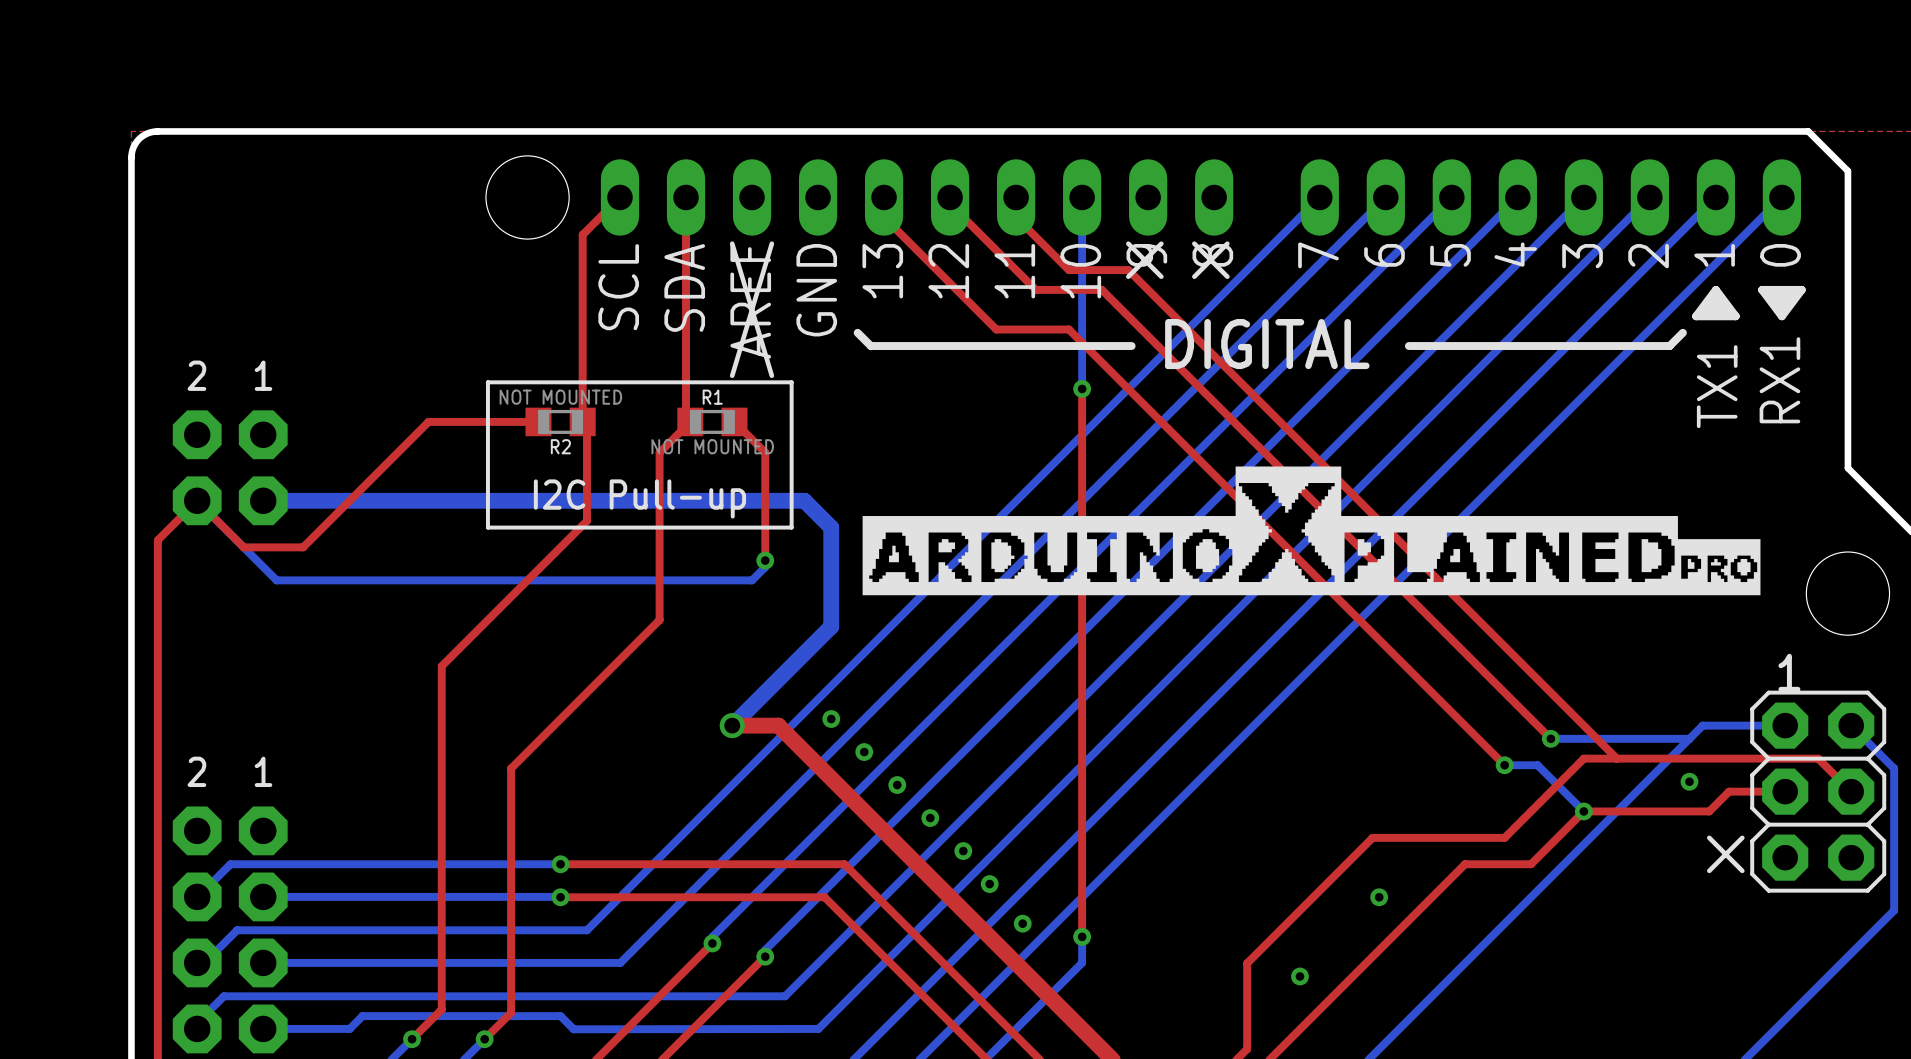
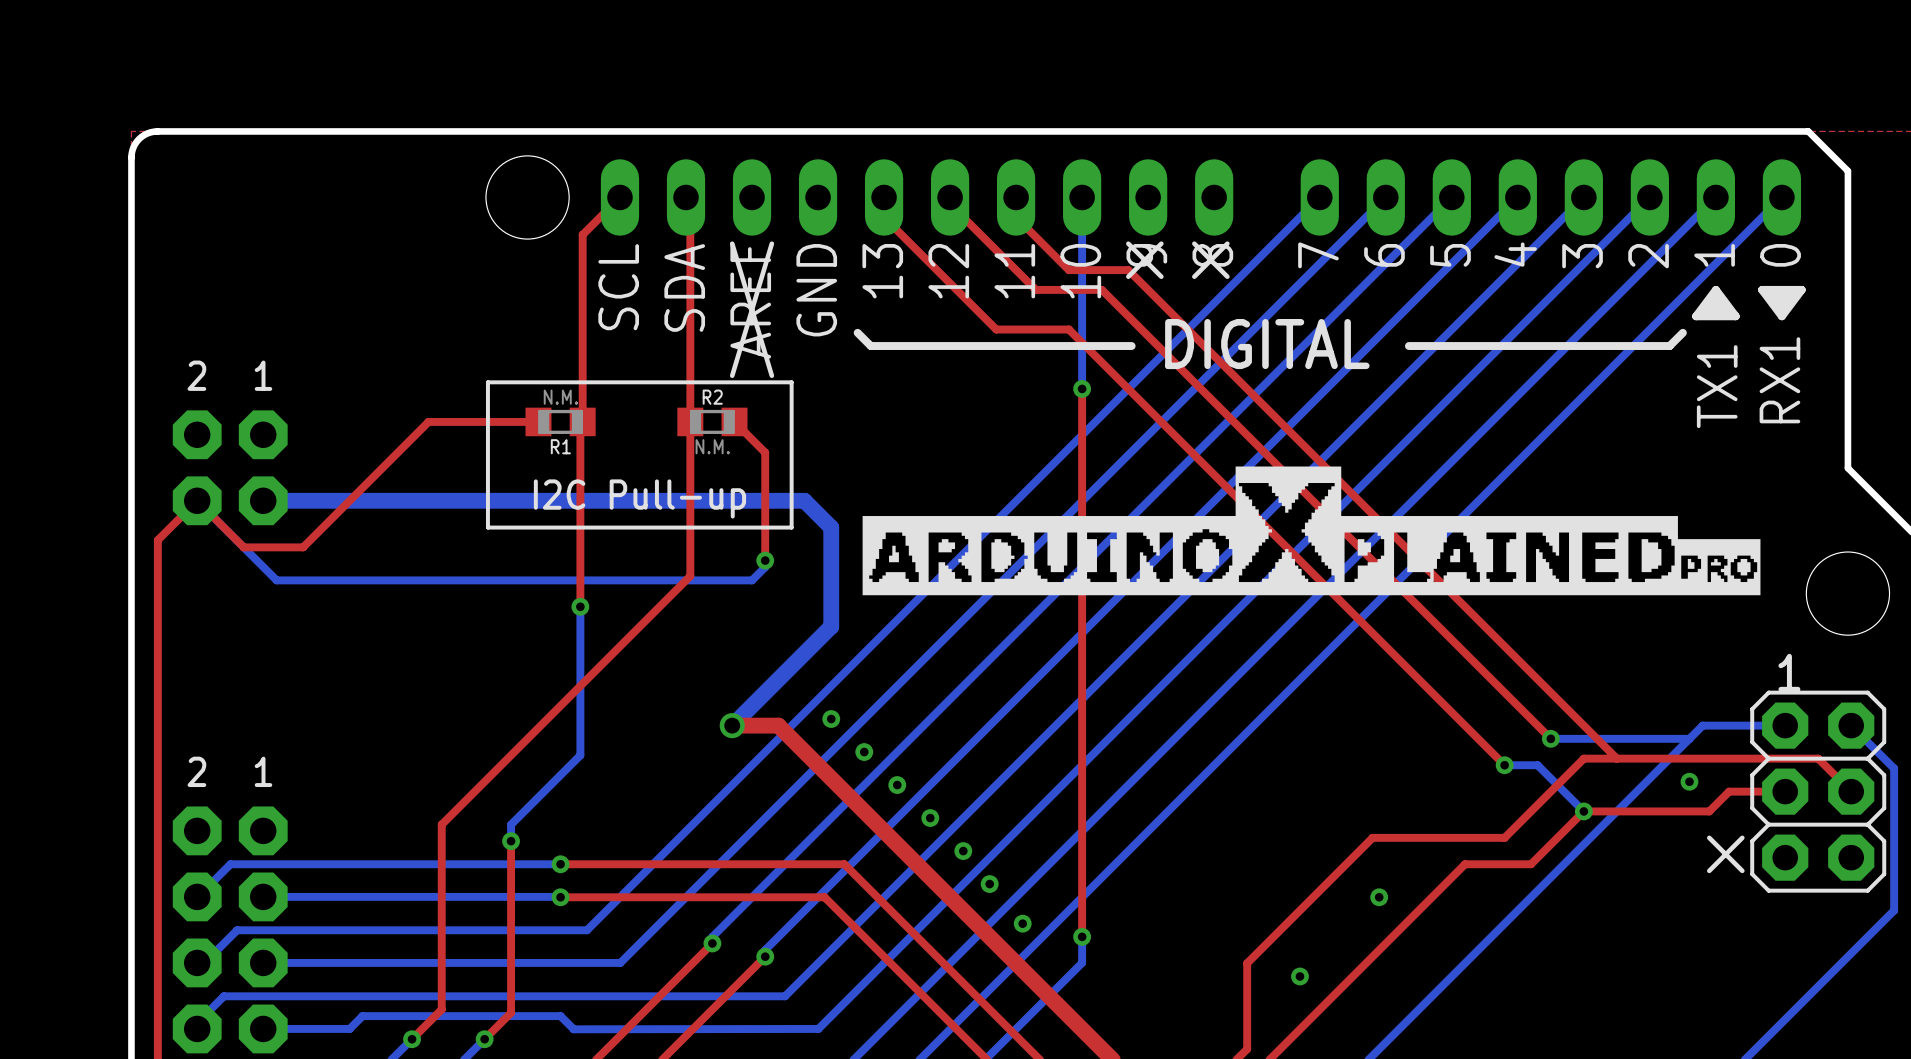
top track: (686, 197) (686, 417) (690, 421) (659, 452) (659, 619) (511, 768) (511, 841) -> (686, 197) (690, 201) (690, 576) (441, 824)
R2 value: NOT MOUNTED (560, 397) -> N.M. (560, 397)
R1 name: R1 (712, 397) -> R2 (712, 397)
top track: (582, 421) (586, 426) (586, 520) (441, 666) (441, 824) -> (582, 421) (580, 424) (580, 606)
R2 name: R2 (560, 446) -> R1 (560, 446)
R1 value: NOT MOUNTED (712, 446) -> N.M. (712, 446)
bottom track: none -> (580, 606) (580, 755) (511, 824) (511, 841)
via: none -> (580, 606)
via: none -> (511, 841)

